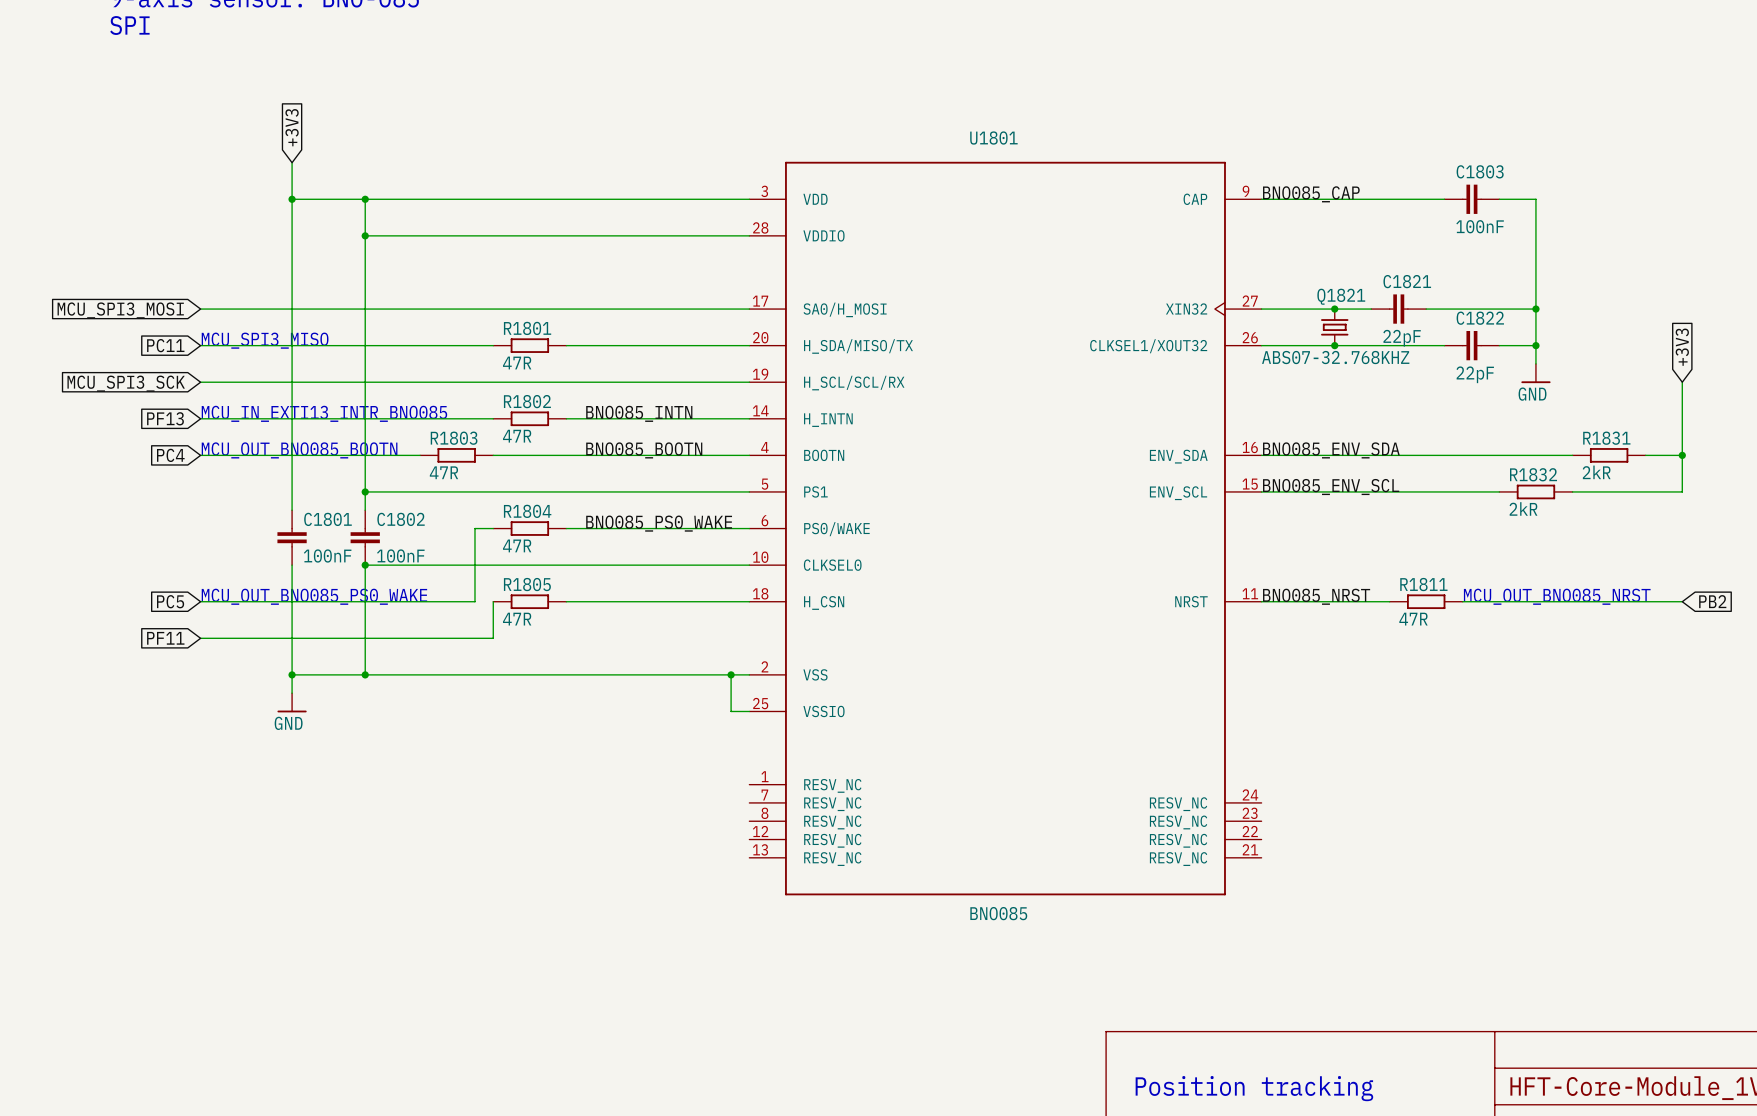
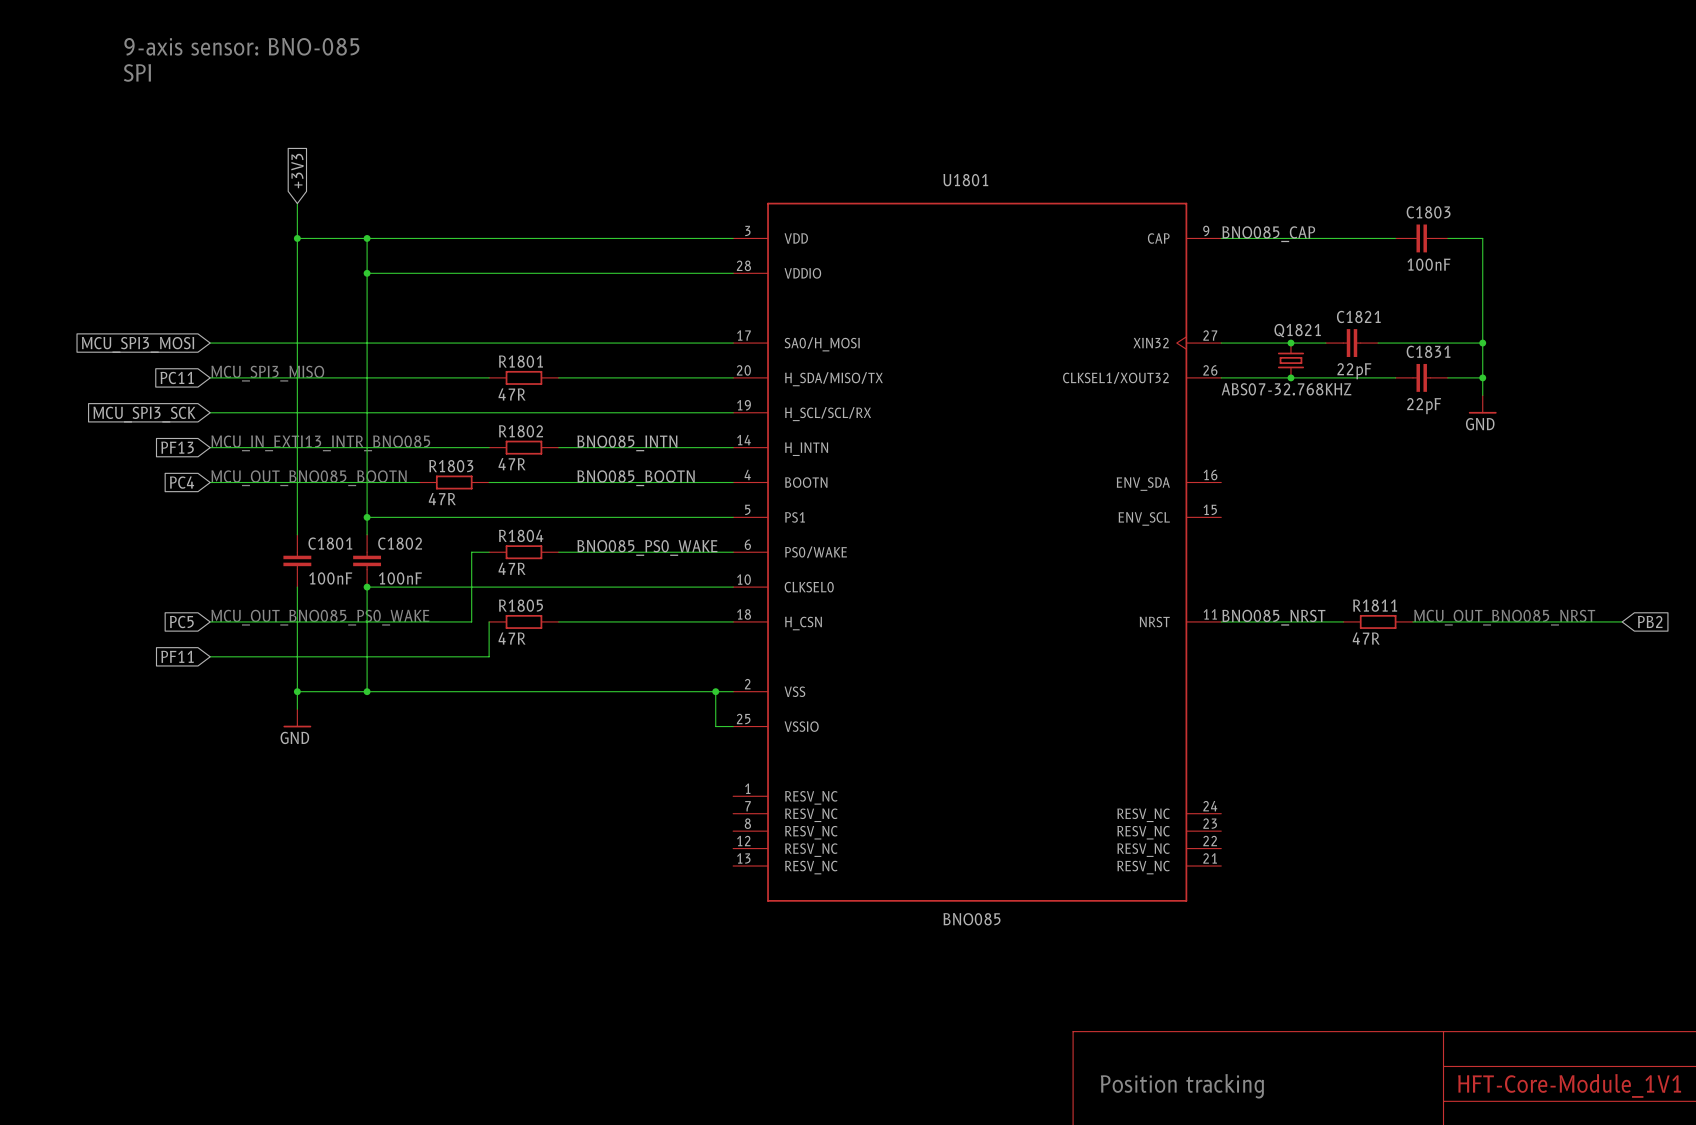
C1822 name: C1822 (1480, 318) -> C1831 (1428, 351)
global label: +3V3 (1682, 347) -> none
wire: (1682, 382) (1682, 491) (1572, 491) -> none
label: BNO085_ENV_SDA (1331, 450) -> none
wire: (1261, 455) (1572, 455) -> none
R1831: 2kR (1609, 455) -> none
wire: (1645, 455) (1682, 455) -> none
junction: (1682, 455) -> none
label: BNO085_ENV_SCL (1331, 487) -> none
wire: (1261, 491) (1499, 491) -> none
R1832: 2kR (1535, 491) -> none

